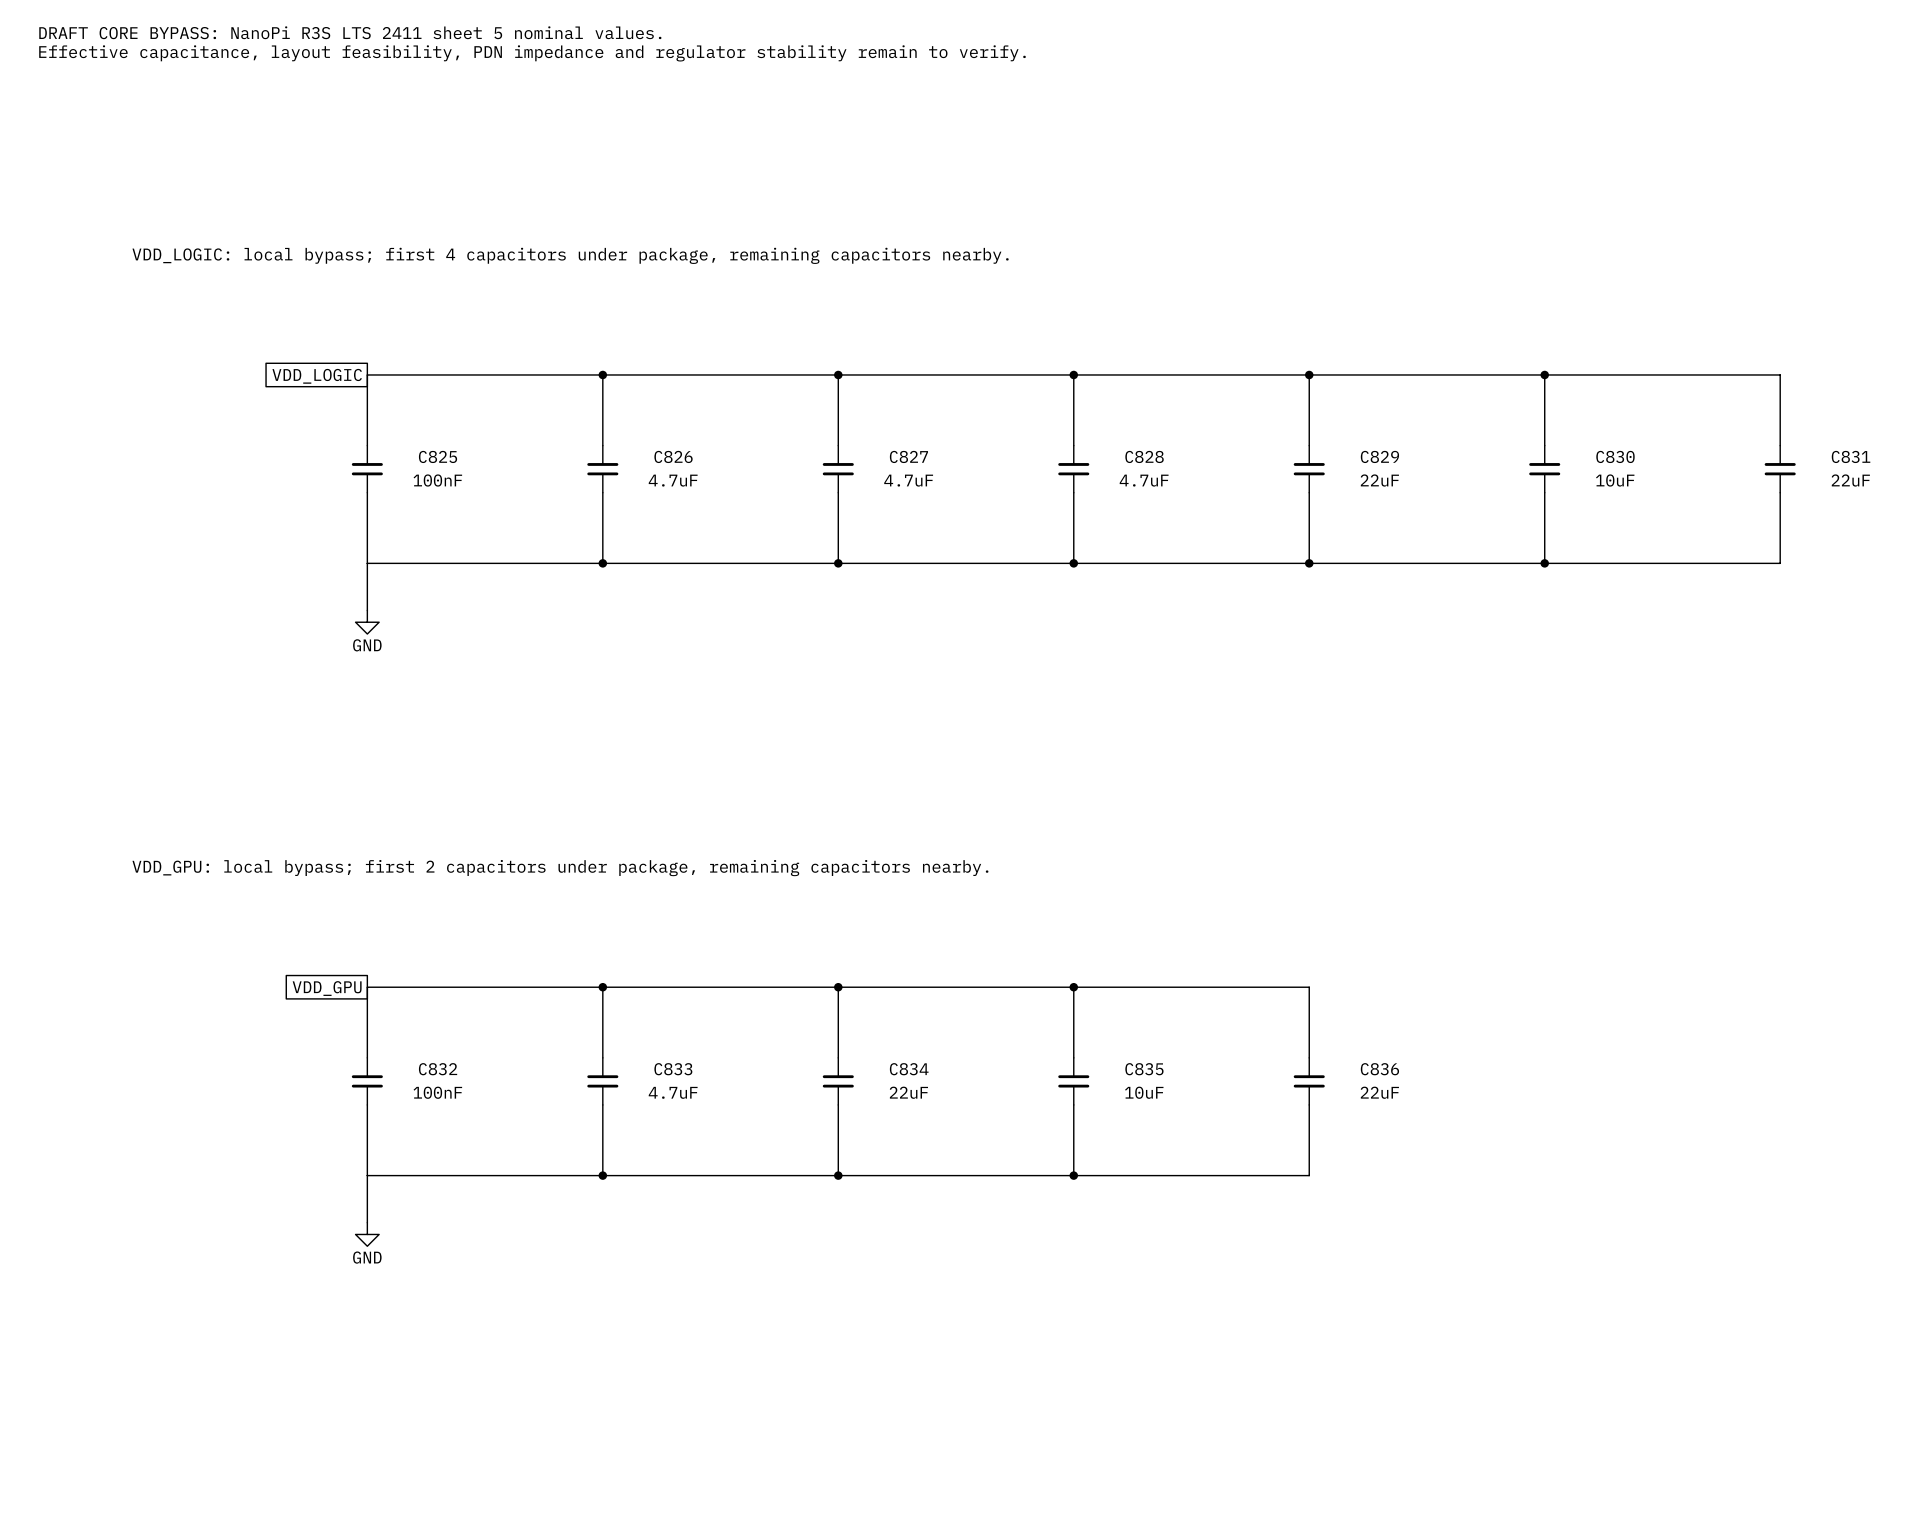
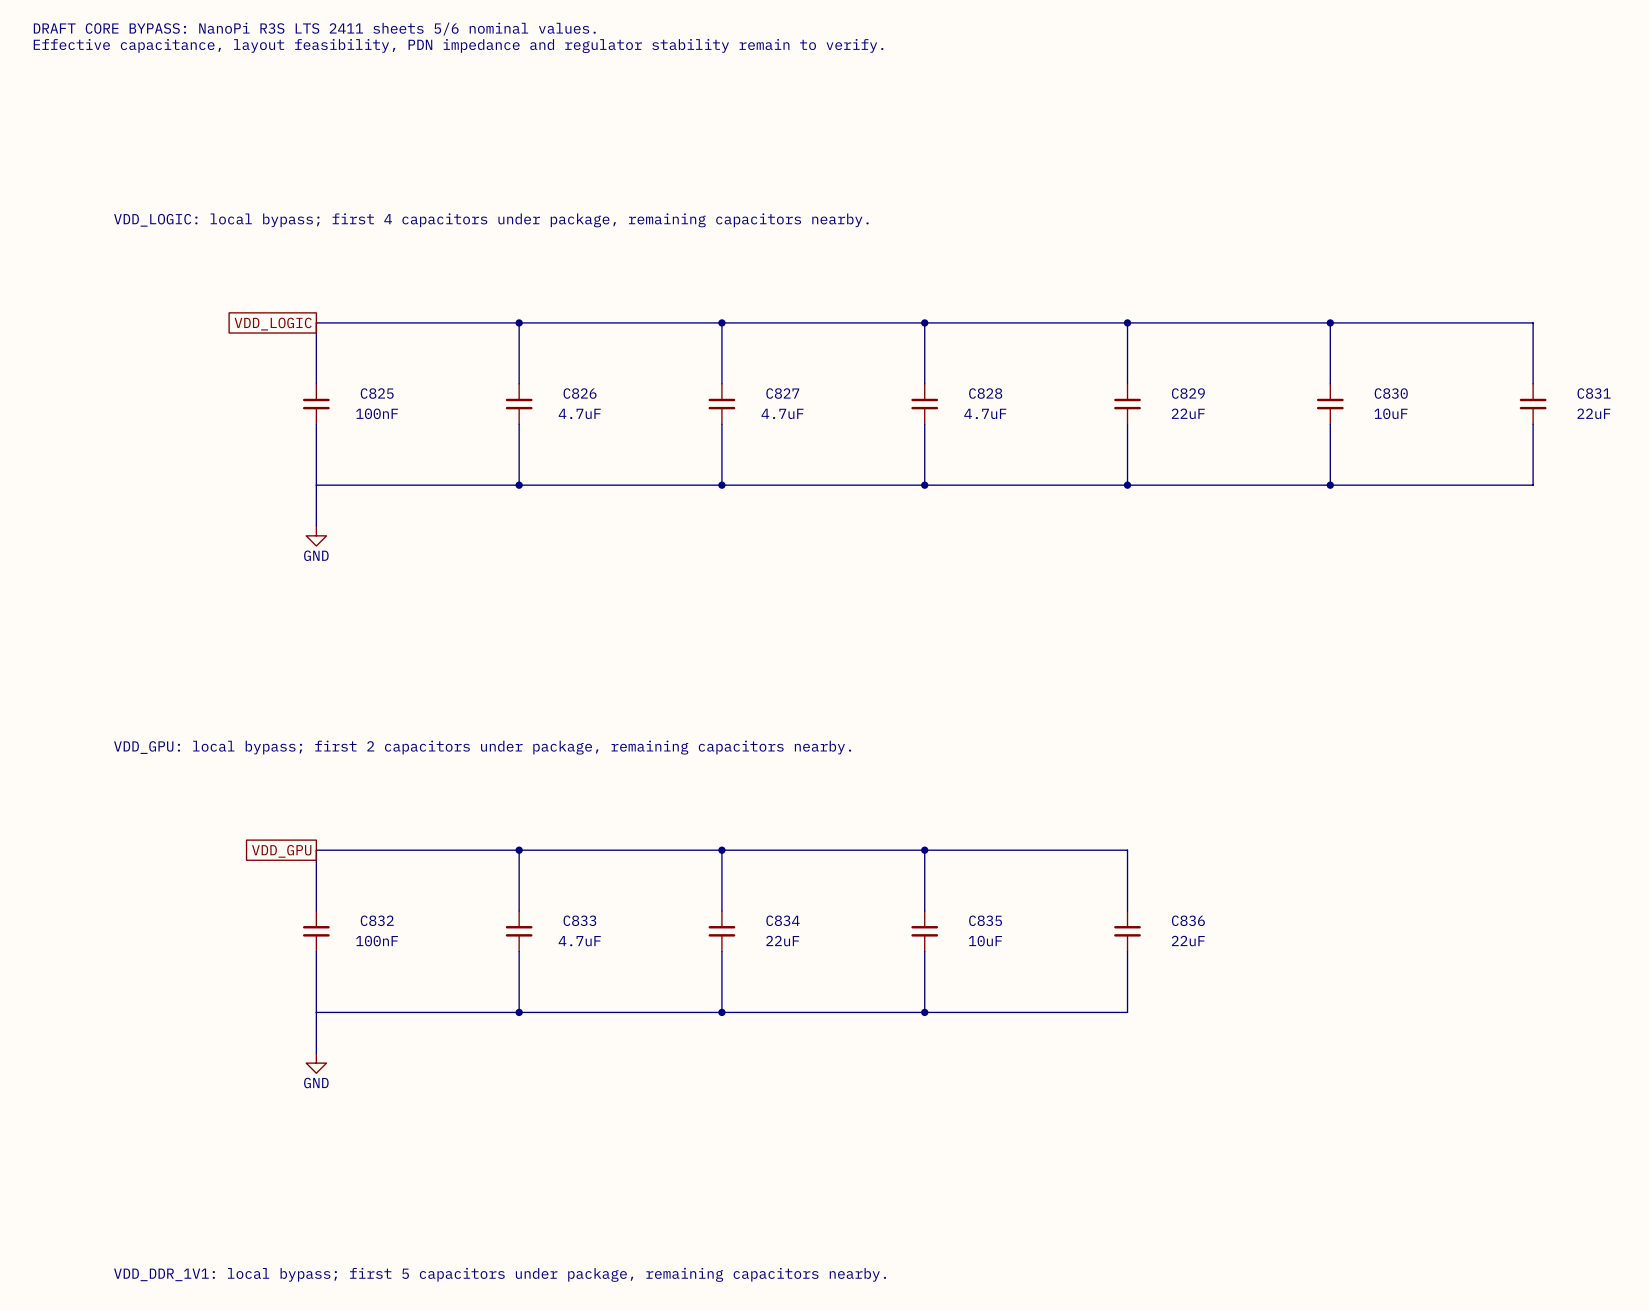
text: DRAFT CORE BYPASS: NanoPi R3S LTS 2411 sheet 5 nominal values. (350, 32) -> DRAFT CORE BYPASS: NanoPi R3S LTS 2411 sheets 5/6 nominal values. (314, 29)
text: none -> VDD_DDR_1V1: local bypass; first 5 capacitors under package, remaining capacitors nearby. (500, 1274)

